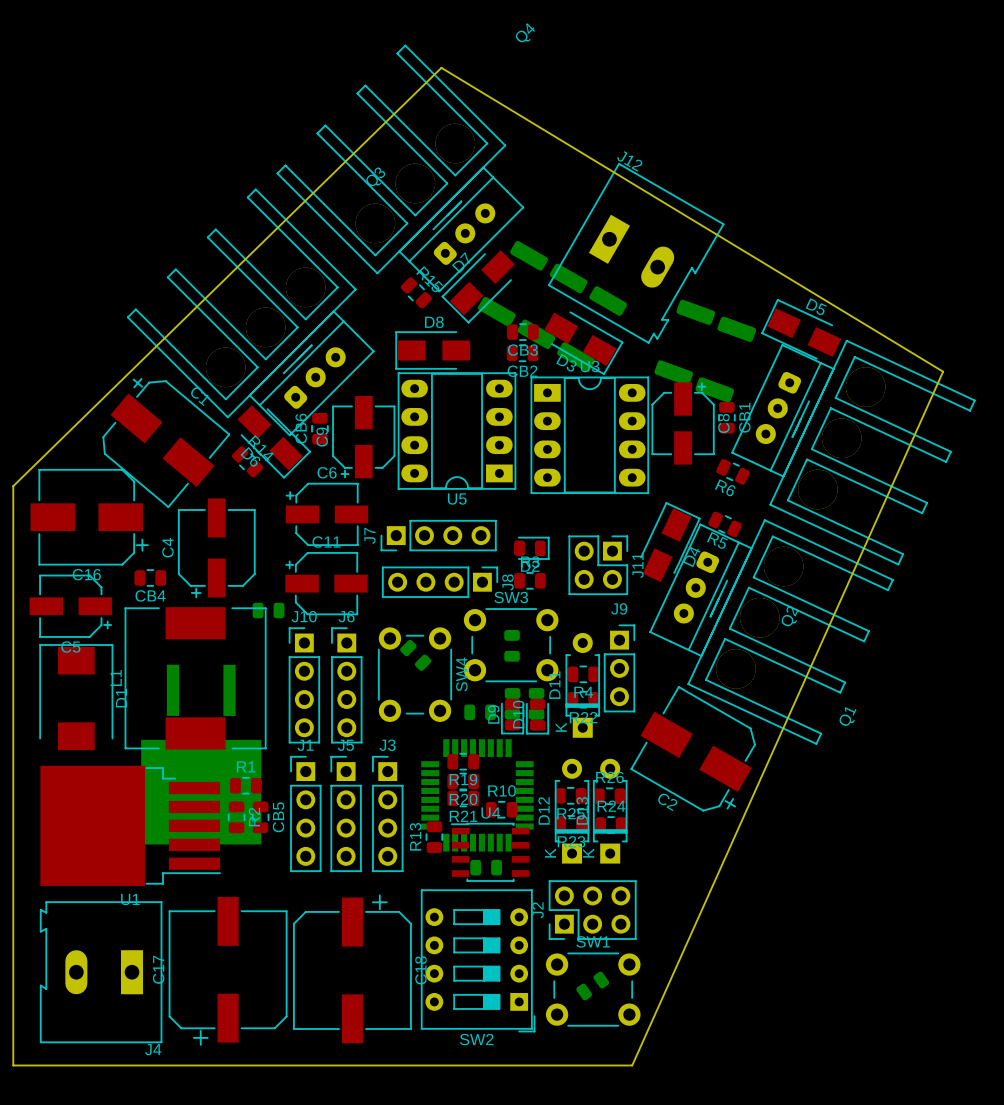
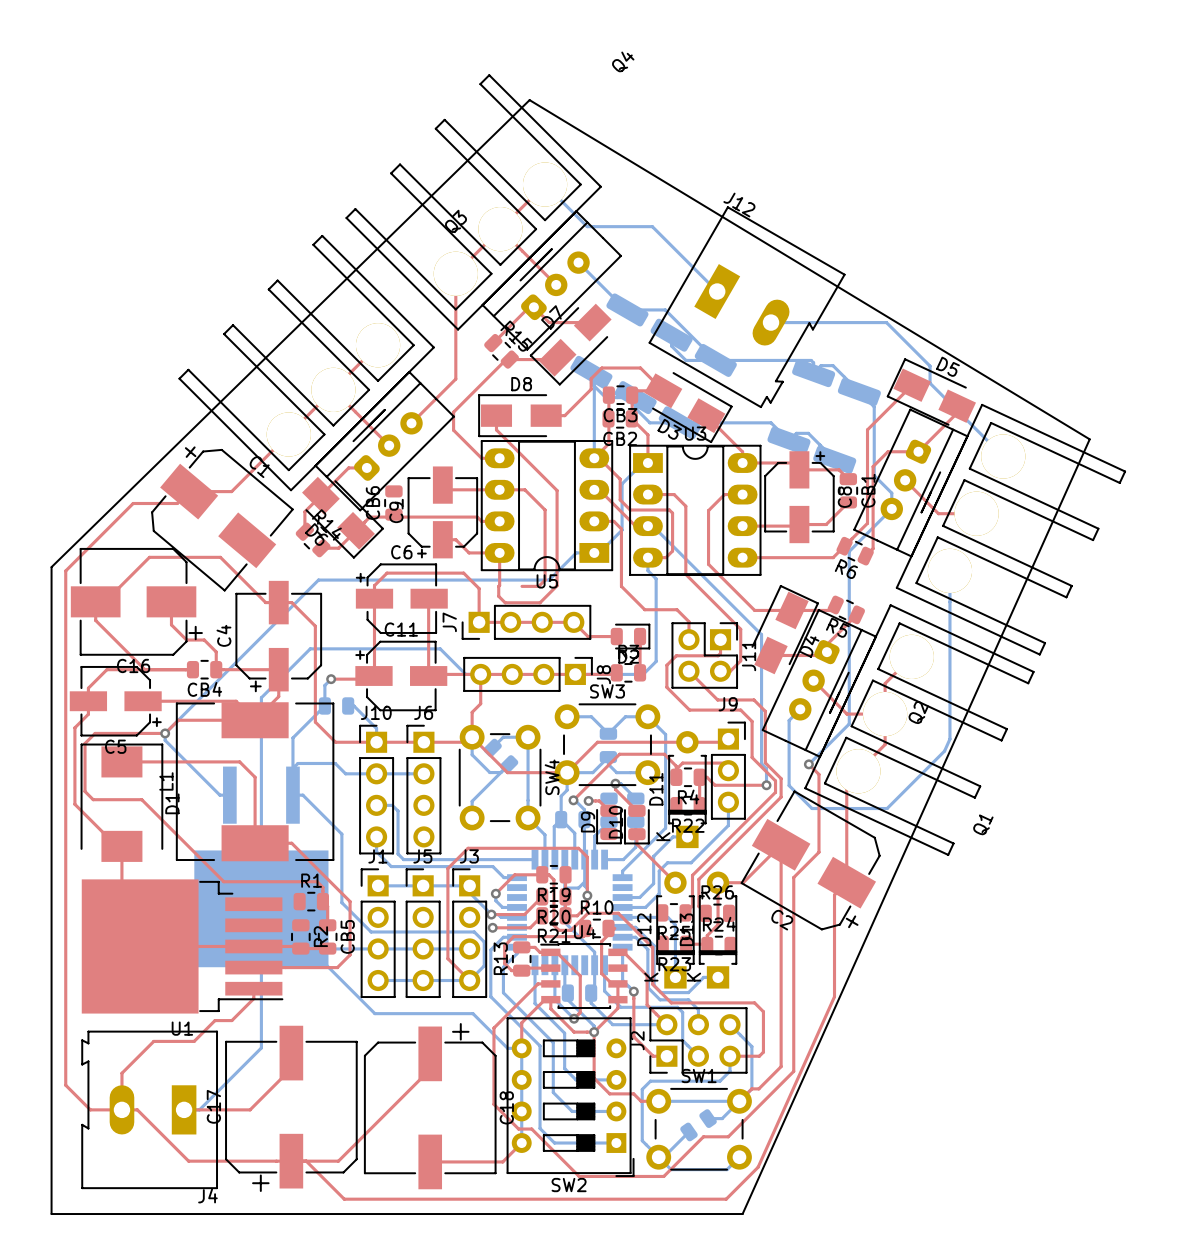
bottom track: none -> (545, 184) (587, 226) (652, 226) (717, 291)
top track: none -> (545, 184) (455, 273) (455, 379) (411, 423)
top track: none -> (500, 229) (556, 284)
bottom track: none -> (578, 262) (625, 309) (665, 309) (715, 360)
top track: none -> (592, 322) (549, 322) (533, 307) (529, 307) (493, 343)
bottom track: none -> (771, 322) (886, 322) (930, 366) (930, 383) (1003, 456)
bottom track: none -> (671, 335) (671, 346) (685, 360) (811, 360) (813, 362) (813, 373) (821, 365) (833, 365) (874, 406) (874, 475) (891, 493) (891, 508) (849, 551) (849, 723) (808, 764)
top track: none -> (378, 345) (231, 491) (189, 491) (177, 503) (133, 503) (65, 570) (65, 1085) (90, 1109) (137, 1109) (188, 1161) (338, 1161) (430, 1069) (430, 1053)
top track: none -> (557, 357) (555, 359) (506, 359) (453, 412) (453, 430) (481, 458) (499, 458)
top track: none -> (912, 385) (867, 429) (867, 523) (833, 557) (742, 557)
top track: none -> (333, 389) (389, 445)
top track: none -> (608, 395) (608, 443) (594, 458) (599, 458) (620, 479) (620, 499) (630, 510) (669, 510) (672, 513) (672, 551) (665, 557) (647, 557)
top track: none -> (957, 406) (957, 413) (918, 451) (887, 451) (873, 466) (873, 548) (865, 556)
top track: none -> (496, 415) (496, 429) (557, 490) (557, 585) (540, 602) (505, 602) (498, 596) (499, 552) (469, 552) (455, 539) (442, 539) (442, 531)
top track: none -> (546, 415) (564, 415) (591, 389) (591, 378) (601, 368) (640, 368) (663, 390) (636, 390) (632, 395) (631, 418) (647, 434) (647, 463)
top track: none -> (706, 415) (742, 451) (742, 463) (792, 463) (799, 469) (839, 469) (848, 479)
bottom track: none -> (594, 458) (594, 375) (591, 372) (591, 383) (605, 397) (635, 397) (635, 408) (649, 422) (771, 422) (788, 440) (796, 433) (808, 433) (834, 459)
bottom track: none -> (647, 463) (642, 463) (622, 483) (622, 530) (599, 552) (576, 552) (549, 580) (318, 580) (165, 733) (165, 740) (219, 795) (229, 795)
top track: none -> (366, 467) (348, 467) (304, 511) (304, 531)
top track: none -> (905, 480) (938, 513) (976, 513)
top track: none -> (594, 489) (599, 489) (635, 526) (647, 526)
top track: none -> (436, 491) (442, 485) (447, 489) (524, 489) (545, 510) (545, 580) (538, 586) (522, 586)
top track: none -> (647, 494) (674, 494) (685, 506) (685, 574) (740, 629) (740, 660) (730, 671) (720, 671)
top track: none -> (742, 494) (724, 494) (708, 510) (708, 564) (754, 610) (830, 610) (835, 604)
top track: none -> (848, 502) (826, 524) (742, 526)
top track: none -> (499, 521) (481, 521) (477, 517) (369, 517) (338, 548) (321, 548)
top track: none -> (594, 521) (613, 521) (621, 528) (621, 586) (644, 609) (676, 609) (688, 621) (688, 639)
bottom track: none -> (647, 526) (652, 526) (761, 634) (761, 763) (766, 768) (766, 785)
bottom track: none -> (647, 557) (647, 570) (656, 578) (656, 661) (643, 674) (575, 674)
bottom track: none -> (949, 570) (949, 739) (944, 751) (887, 808) (812, 808) (789, 785) (789, 720) (800, 709)
top track: none -> (429, 598) (428, 675) (430, 674) (615, 674) (616, 672)
top track: none -> (171, 601) (171, 624) (186, 640) (204, 640) (216, 651) (216, 669) (278, 669) (278, 696) (255, 720)
top track: none -> (856, 614) (826, 644) (826, 652) (823, 655) (771, 655)
top track: none -> (616, 636) (588, 636) (573, 622) (479, 622) (479, 588) (463, 573) (387, 573) (374, 585) (374, 675) (370, 679) (331, 679)
top track: none -> (640, 636) (640, 672)
top track: none -> (720, 639) (720, 653) (718, 655) (676, 655) (666, 665) (666, 687) (689, 710) (740, 710) (752, 721) (752, 757) (775, 780) (775, 792) (692, 875) (692, 906) (685, 912)
top track: none -> (911, 656) (885, 683) (885, 744) (846, 782) (846, 882) (834, 894) (834, 996) (758, 1167) (726, 1199) (344, 1199) (306, 1161)
top track: none -> (144, 669) (95, 620) (95, 601) (105, 601) (149, 557) (220, 557) (265, 602) (291, 602) (315, 626) (315, 722) (335, 742) (467, 742) (472, 737)
top track: none -> (192, 669) (106, 669) (88, 688) (88, 714) (74, 727) (74, 804) (116, 846) (121, 846) (121, 928) (140, 946) (298, 946) (300, 948) (327, 948)
top track: none -> (688, 671) (717, 699) (753, 699) (765, 711) (765, 762) (781, 778) (781, 797) (698, 879) (698, 906) (705, 913)
bottom track: none -> (480, 674) (465, 674) (440, 648) (310, 648) (261, 697) (261, 1047) (199, 1109) (184, 1109)
top track: none -> (480, 674) (480, 703) (472, 712) (472, 737)
bottom track: none -> (331, 679) (324, 685) (324, 705) (292, 737) (292, 795) (302, 795) (341, 834) (341, 902) (371, 931) (474, 931) (484, 941) (484, 965) (469, 980) (378, 980)
via: none -> (331, 679)
top track: none -> (813, 680) (846, 714) (885, 714)
top track: none -> (143, 701) (236, 701) (255, 720)
bottom track: none -> (348, 705) (353, 705) (376, 728) (376, 742)
bottom track: none -> (567, 716) (591, 716) (608, 733) (625, 716) (647, 716) (665, 734) (665, 828) (622, 871) (622, 877)
top track: none -> (255, 720) (178, 720) (165, 733) (95, 733) (85, 743) (85, 791) (93, 799) (141, 799) (223, 881) (317, 881) (322, 887) (322, 901) (327, 906) (327, 925)
via: none -> (165, 733)
bottom track: none -> (472, 737) (472, 754) (489, 772) (500, 772)
top track: none -> (472, 737) (507, 772) (567, 772) (597, 742) (725, 742) (728, 739)
bottom track: none -> (492, 747) (503, 737) (528, 737) (528, 817) (544, 834) (544, 859)
top track: none -> (121, 761) (239, 761) (255, 777) (255, 843) (291, 843) (350, 901) (350, 954) (337, 967) (253, 967)
bottom track: none -> (509, 764) (472, 801) (472, 817)
top track: none -> (808, 764) (818, 774) (818, 852) (793, 877) (793, 1071) (728, 1136) (703, 1136) (663, 1176) (579, 1176) (531, 1129) (518, 1129) (493, 1104) (493, 1028) (538, 983) (550, 983)
via: none -> (808, 764)
bottom track: none -> (292, 768) (297, 763) (335, 763) (345, 773) (423, 773)
top track: none -> (676, 769) (682, 763) (727, 763) (728, 770)
bottom track: none -> (647, 772) (616, 772) (608, 764) (608, 757) (592, 772) (567, 772) (567, 790) (561, 796) (561, 819)
top track: none -> (676, 777) (676, 766) (664, 754) (619, 754) (573, 800)
bottom track: none -> (615, 783) (620, 783) (635, 798)
top track: none -> (615, 783) (615, 789) (636, 810)
via: none -> (615, 783)
top track: none -> (766, 785) (714, 785) (706, 777) (699, 777) (699, 805)
via: none -> (766, 785)
bottom track: none -> (573, 800) (584, 809) (584, 885) (587, 888) (587, 895)
via: none -> (573, 800)
top track: none -> (588, 800) (599, 800) (609, 810)
via: none -> (588, 800)
bottom track: none -> (728, 802) (728, 825) (691, 862) (667, 862) (659, 871) (659, 893) (645, 907) (622, 907)
bottom track: none -> (376, 805) (392, 805) (398, 811) (398, 853) (403, 859) (535, 859)
bottom track: none -> (561, 819) (554, 826) (554, 859)
bottom track: none -> (561, 819) (574, 833) (574, 859)
bottom track: none -> (609, 821) (594, 836) (594, 859)
bottom track: none -> (635, 821) (635, 847) (623, 859) (604, 859)
top track: none -> (636, 834) (636, 844) (675, 882)
bottom track: none -> (376, 836) (376, 851) (391, 866) (492, 866) (503, 877) (517, 877)
bottom track: none -> (687, 836) (673, 836) (653, 856) (653, 883) (639, 897) (622, 897)
bottom track: none -> (564, 859) (564, 922) (594, 952) (594, 989) (591, 993) (591, 1003) (612, 1024) (666, 1024)
top track: none -> (565, 874) (565, 915) (577, 915) (587, 905) (587, 857) (578, 848) (468, 848) (447, 868) (447, 958) (469, 980)
bottom track: none -> (584, 881) (578, 888) (564, 888)
bottom track: none -> (378, 885) (469, 885) (469, 892) (491, 914) (498, 914) (501, 917) (517, 917)
bottom track: none -> (495, 893) (495, 900) (502, 907) (517, 907)
top track: none -> (495, 893) (514, 874) (548, 874) (553, 879) (553, 925) (558, 930) (570, 930) (587, 913) (618, 913) (652, 947) (652, 984) (671, 1002) (754, 1002) (763, 1011) (763, 1052) (759, 1056) (730, 1056)
via: none -> (495, 893)
via: none -> (587, 895)
top track: none -> (542, 896) (524, 914) (491, 914)
via: none -> (491, 914)
top track: none -> (542, 915) (530, 927) (492, 927)
bottom track: none -> (622, 917) (667, 917) (675, 924) (675, 977)
bottom track: none -> (622, 927) (635, 927) (654, 945) (654, 985) (661, 992) (688, 992) (703, 977) (718, 977)
via: none -> (492, 927)
top track: none -> (591, 928) (583, 936) (513, 936) (504, 945) (504, 963) (511, 970) (521, 970) (524, 968) (550, 968)
top track: none -> (614, 928) (601, 941) (601, 973) (612, 983) (617, 983) (617, 1008) (594, 1032)
bottom track: none -> (517, 937) (503, 937) (490, 949) (490, 996) (540, 1045) (540, 1128) (554, 1143) (616, 1143)
bottom track: none -> (622, 937) (635, 937) (647, 949) (648, 988) (660, 999) (688, 999) (698, 1009) (698, 1024)
top track: none -> (686, 944) (707, 945) (707, 935) (718, 924) (718, 882) (743, 882) (781, 844) (781, 1066) (758, 1088) (751, 1088) (739, 1101)
bottom track: none -> (517, 947) (517, 953) (503, 967) (503, 992) (553, 1042) (553, 1092) (572, 1111) (616, 1111)
top track: none -> (521, 947) (534, 947) (539, 952) (556, 952) (580, 975) (580, 1012) (574, 1018)
bottom track: none -> (622, 947) (622, 980) (633, 991)
bottom track: none -> (469, 948) (301, 948) (261, 908) (270, 908) (374, 1013) (472, 1013) (507, 1048) (521, 1048) (521, 1143)
top track: none -> (617, 952) (623, 952) (647, 975) (647, 1004) (666, 1024)
bottom track: none -> (535, 965) (535, 1003) (564, 1033) (564, 1068) (576, 1079) (616, 1079)
bottom track: none -> (554, 965) (554, 999) (574, 1018)
bottom track: none -> (564, 965) (564, 990) (567, 993) (567, 999) (594, 1026) (594, 1032)
bottom track: none -> (604, 965) (604, 991) (620, 1007) (677, 1007) (682, 1012) (682, 1040) (698, 1056)
top track: none -> (253, 988) (253, 998) (231, 1020) (215, 1020) (194, 1041) (153, 1041) (121, 1073) (121, 1109)
top track: none -> (633, 991) (633, 1036) (653, 1056) (666, 1056)
via: none -> (633, 991)
via: none -> (574, 1018)
bottom track: none -> (730, 1024) (751, 1046) (751, 1088) (722, 1118) (708, 1118)
top track: none -> (594, 1032) (574, 1032) (550, 1008) (550, 999) (544, 999) (521, 1022) (521, 1048)
top track: none -> (594, 1032) (594, 1078) (609, 1093) (633, 1093) (641, 1101) (658, 1101)
via: none -> (594, 1032)
top track: none -> (291, 1053) (291, 1068) (250, 1109) (184, 1109)
bottom track: none -> (730, 1056) (730, 1071) (720, 1081) (650, 1081) (642, 1089) (642, 1140) (671, 1169) (727, 1169) (739, 1157)
bottom track: none -> (658, 1101) (739, 1101)
bottom track: none -> (688, 1131) (663, 1157) (658, 1157)
top track: none -> (521, 1143) (502, 1161) (430, 1161)

